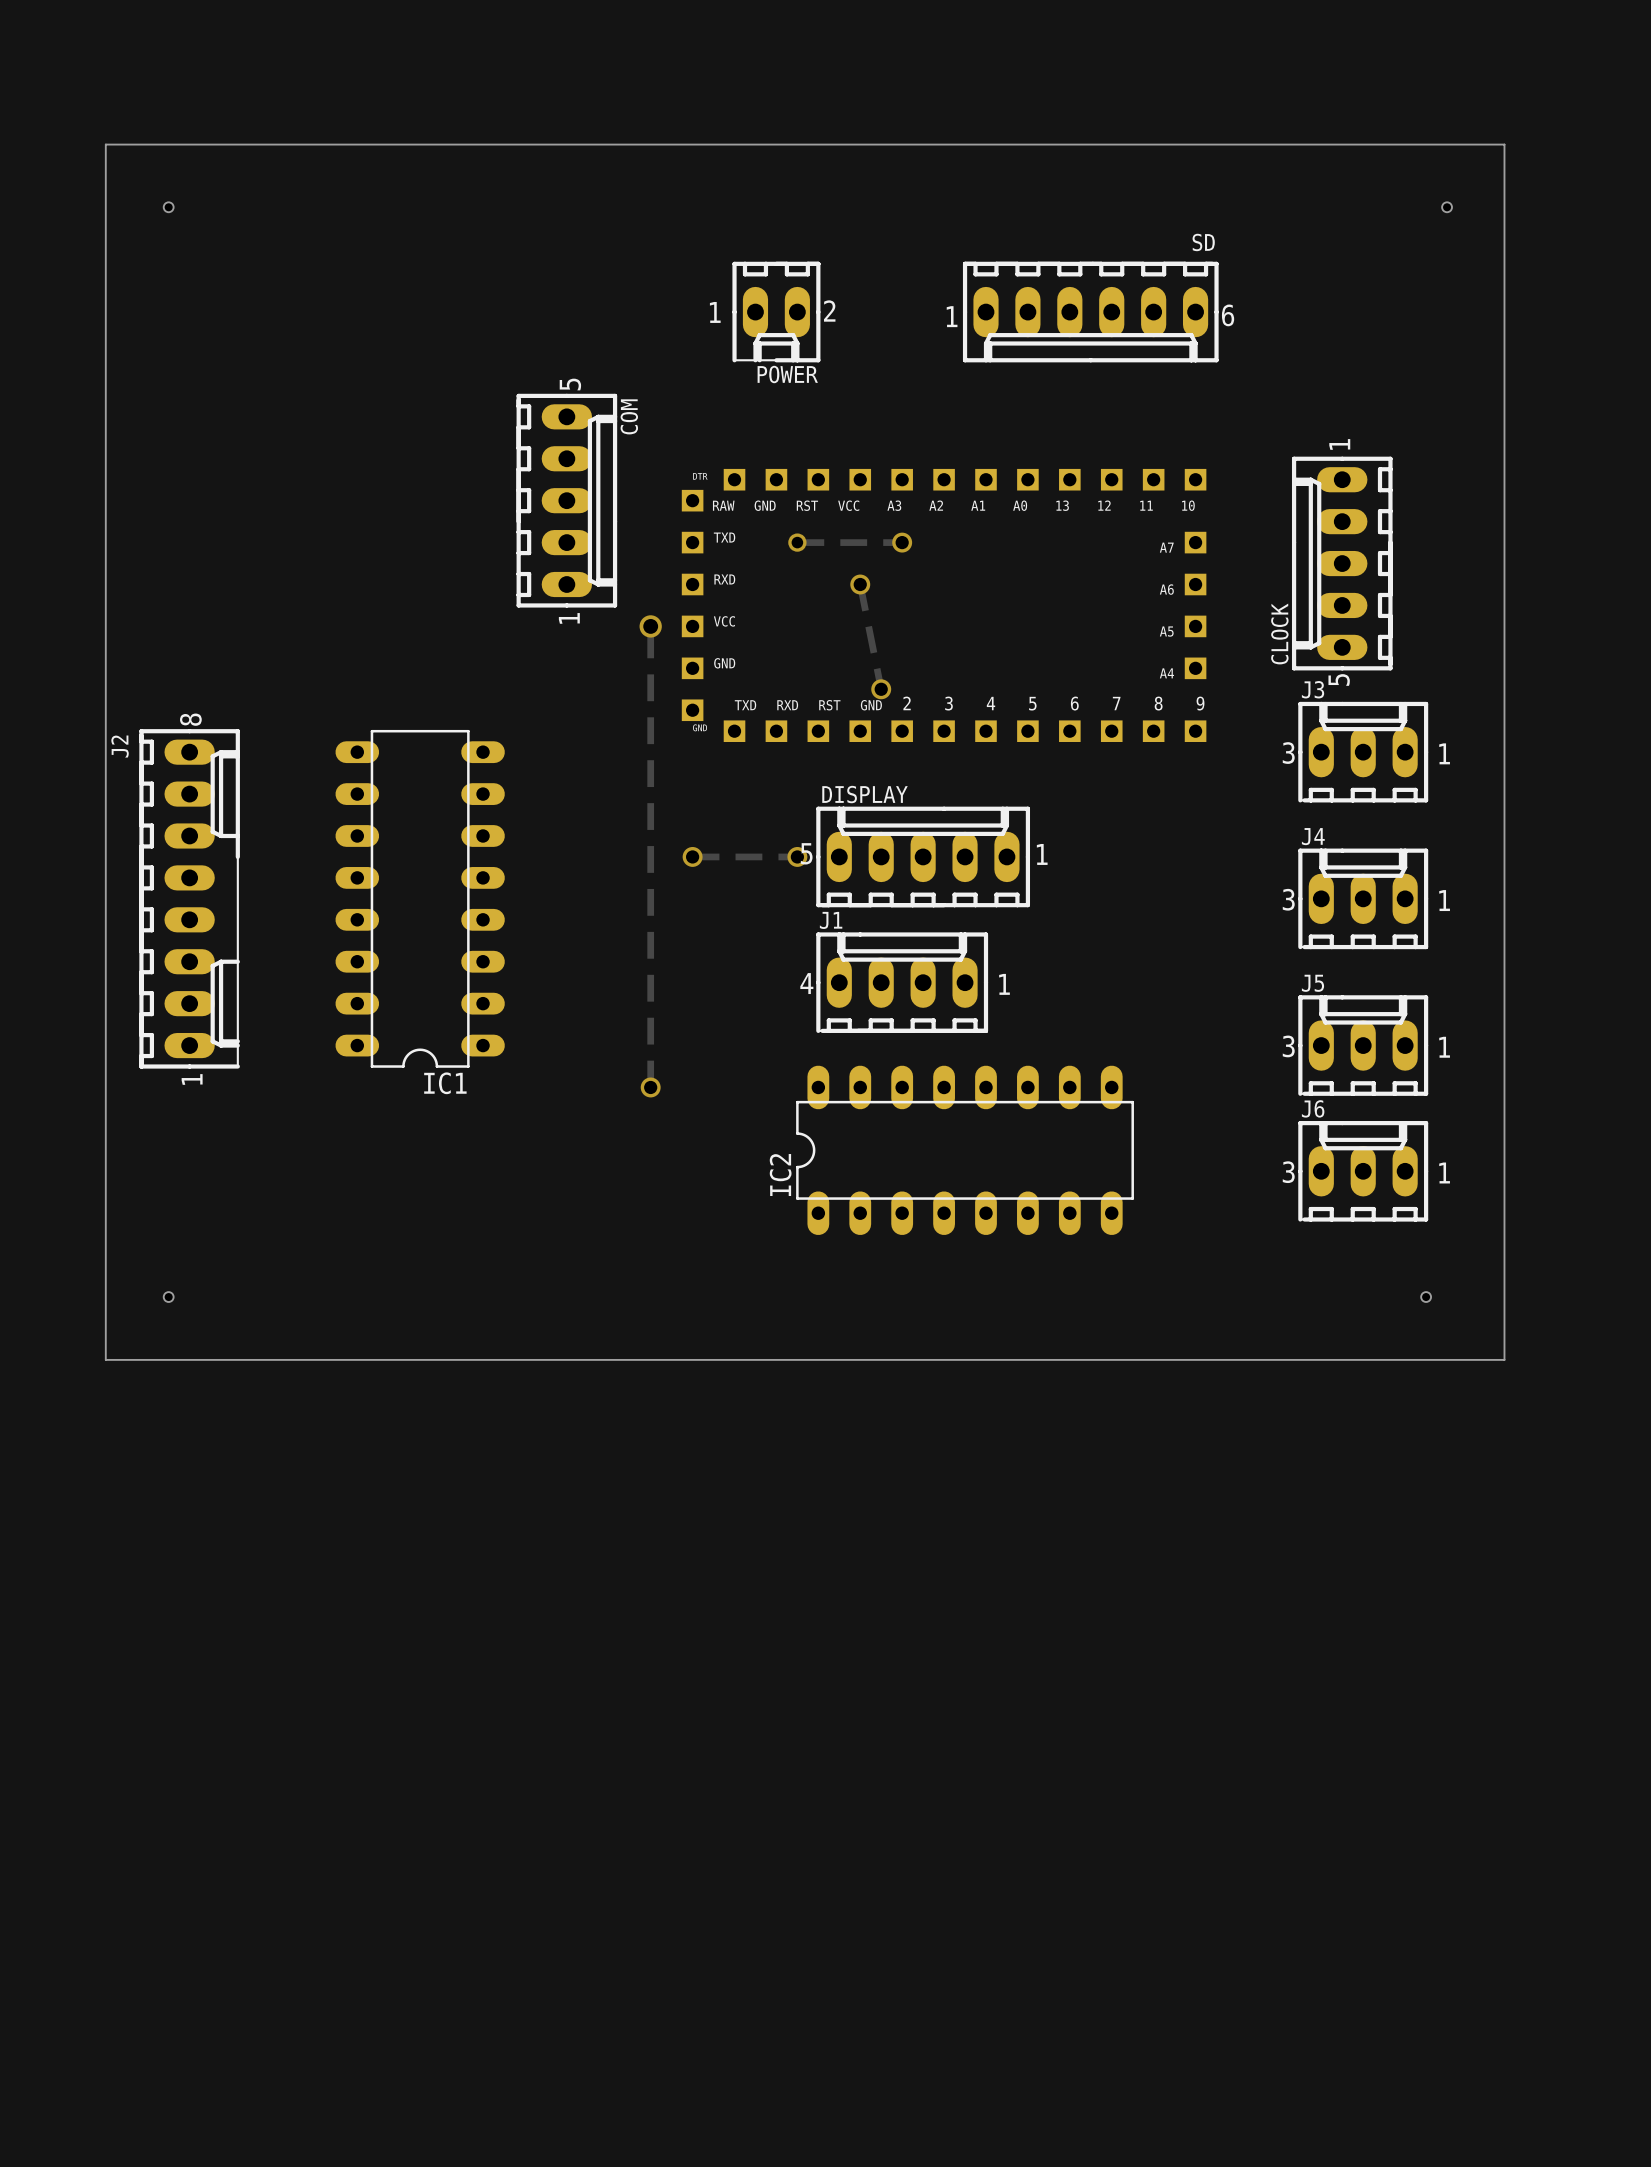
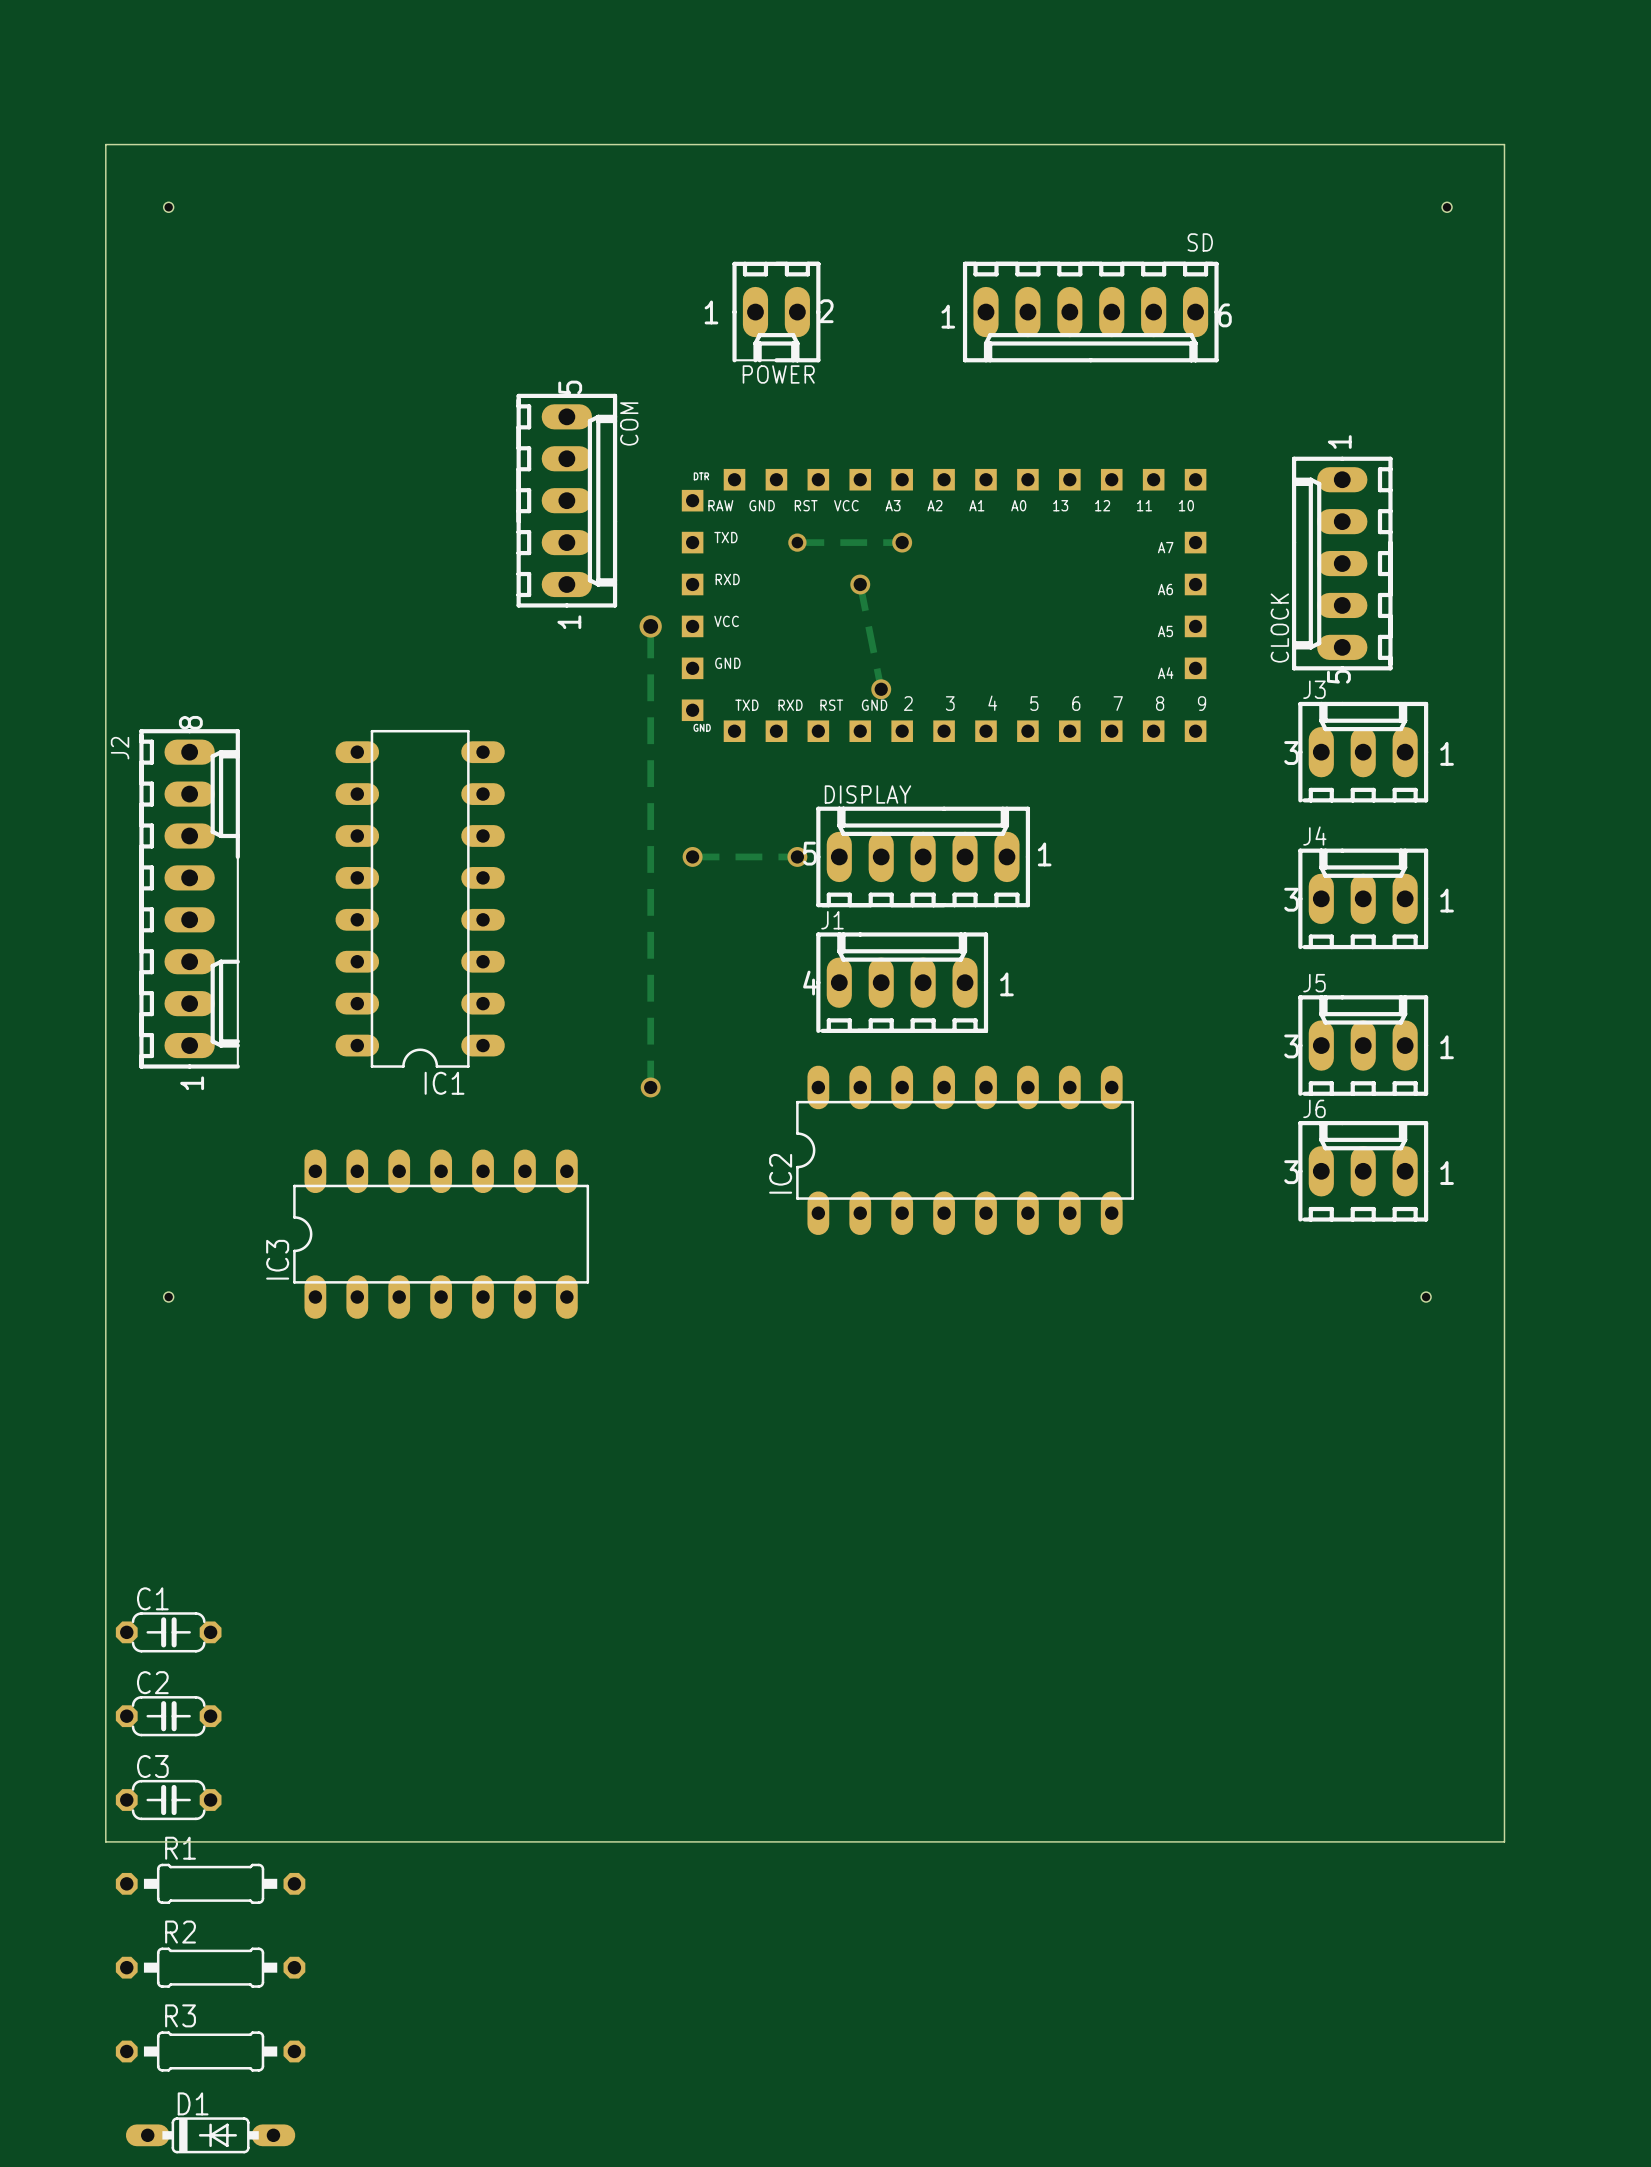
IC3: none -> (441, 1234)
board edge: (105, 1359) (1504, 1359) -> (105, 1359) (105, 1841) (1504, 1841) (1504, 1359)
C1: none -> (168, 1632)
C2: none -> (168, 1716)
C3: none -> (168, 1800)
R1: none -> (210, 1883)
R2: none -> (210, 1967)
R3: none -> (210, 2051)
D1: none -> (210, 2135)

